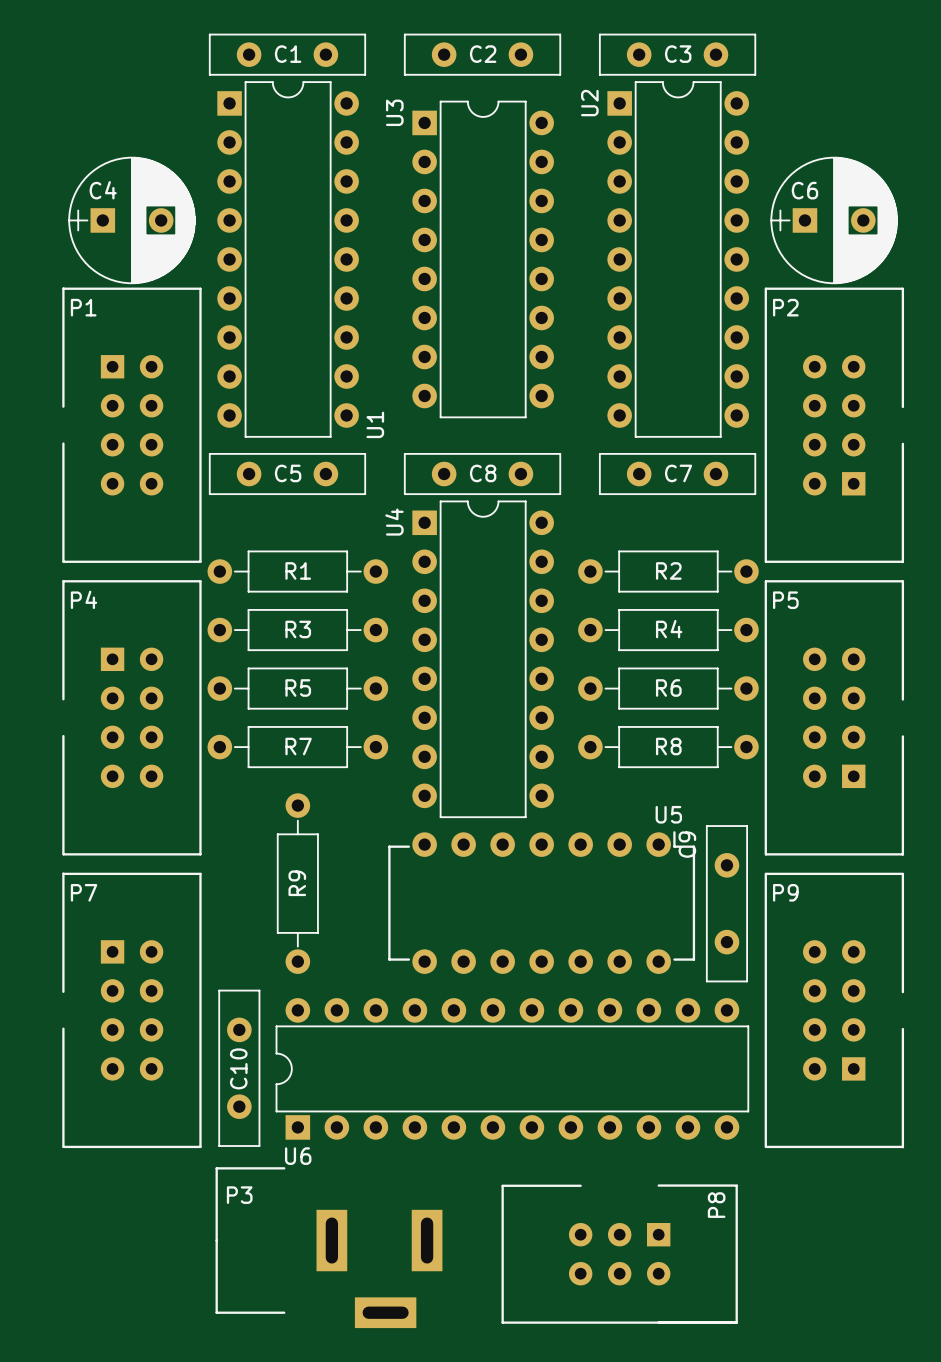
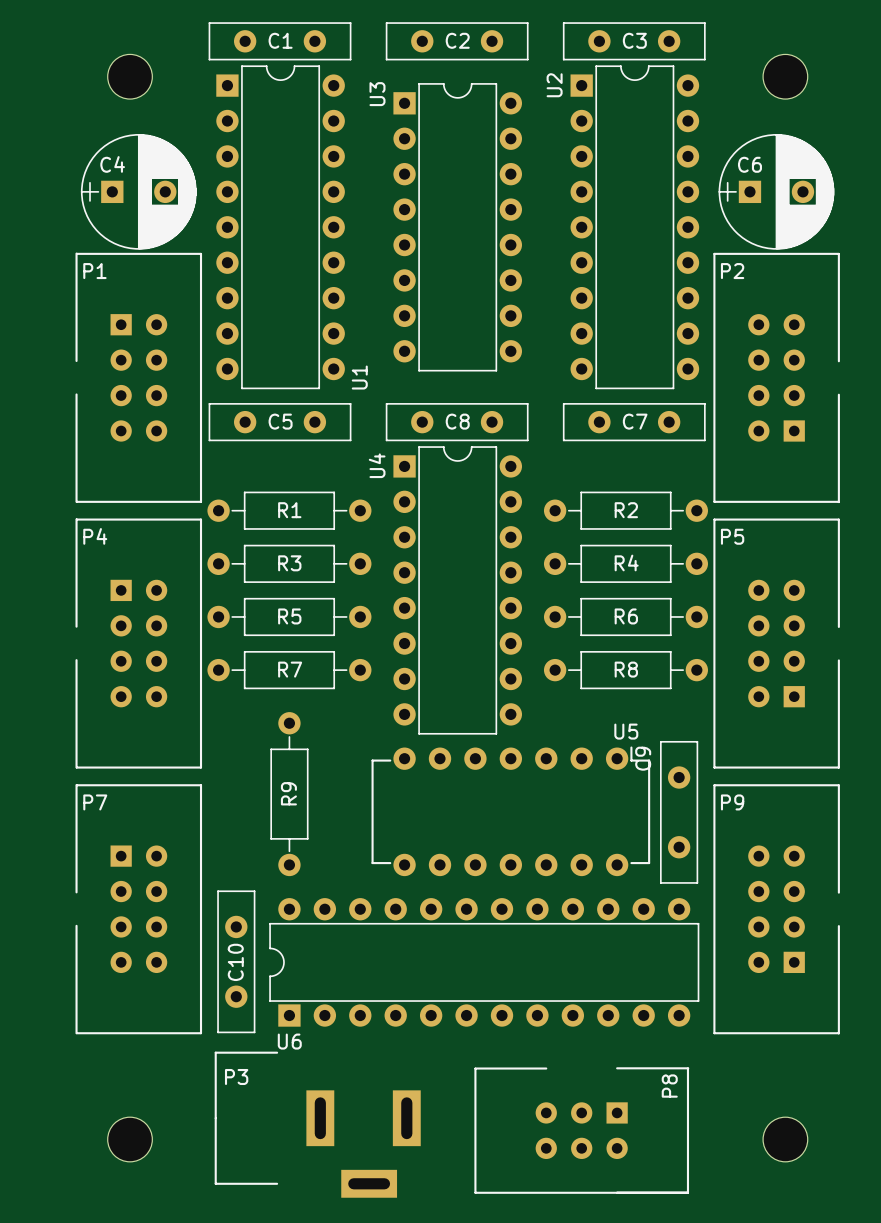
part: none -> (130, 76)
part: none -> (785, 76)
part: none -> (130, 1139)
part: none -> (785, 1139)

